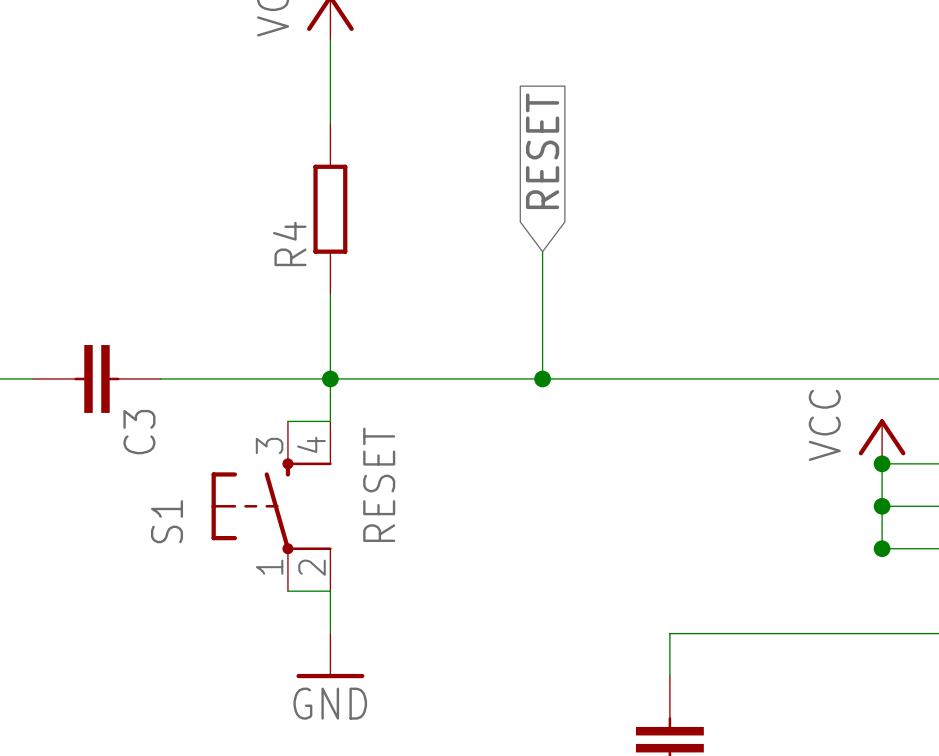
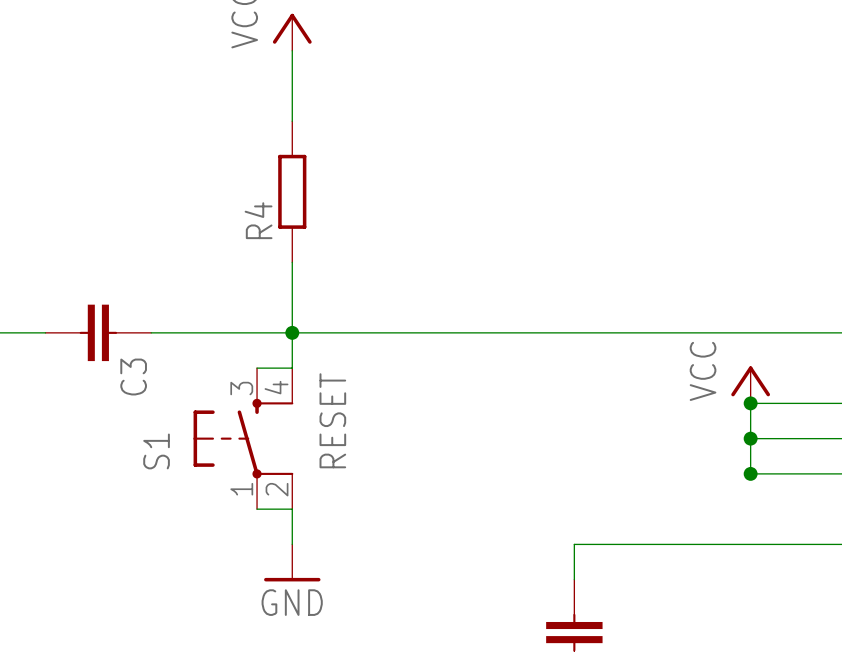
global label: RESET (542, 151) -> none
wire: (542, 251) (542, 378) -> none
junction: (542, 378) -> none

